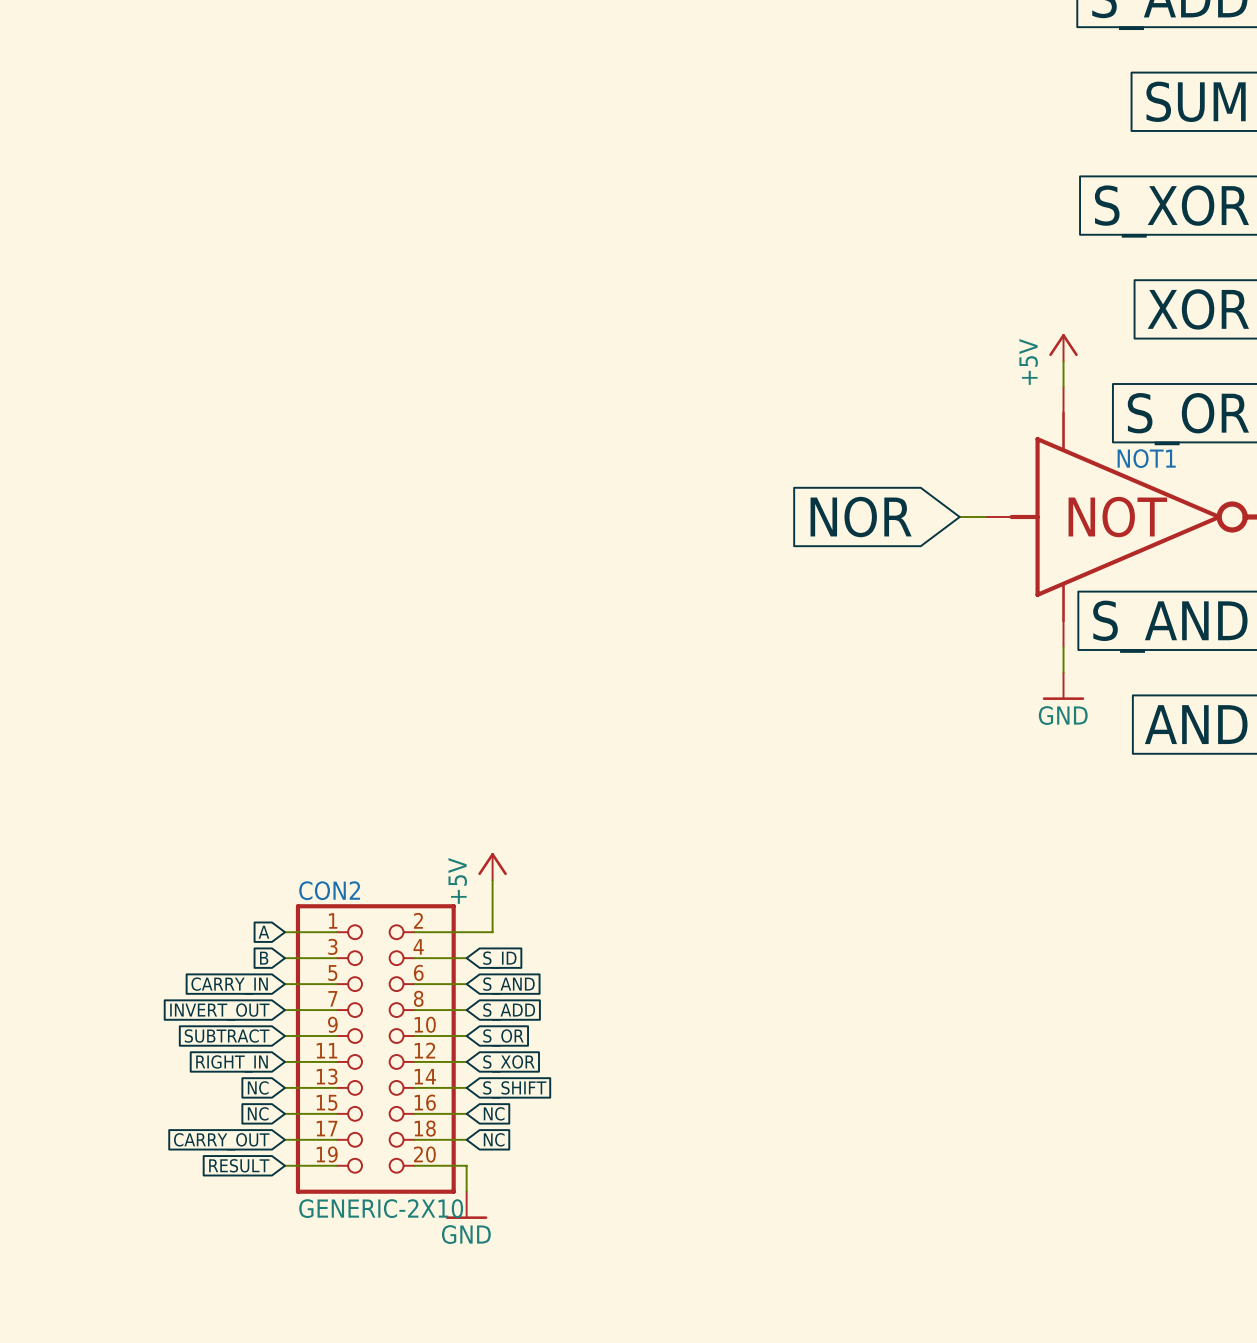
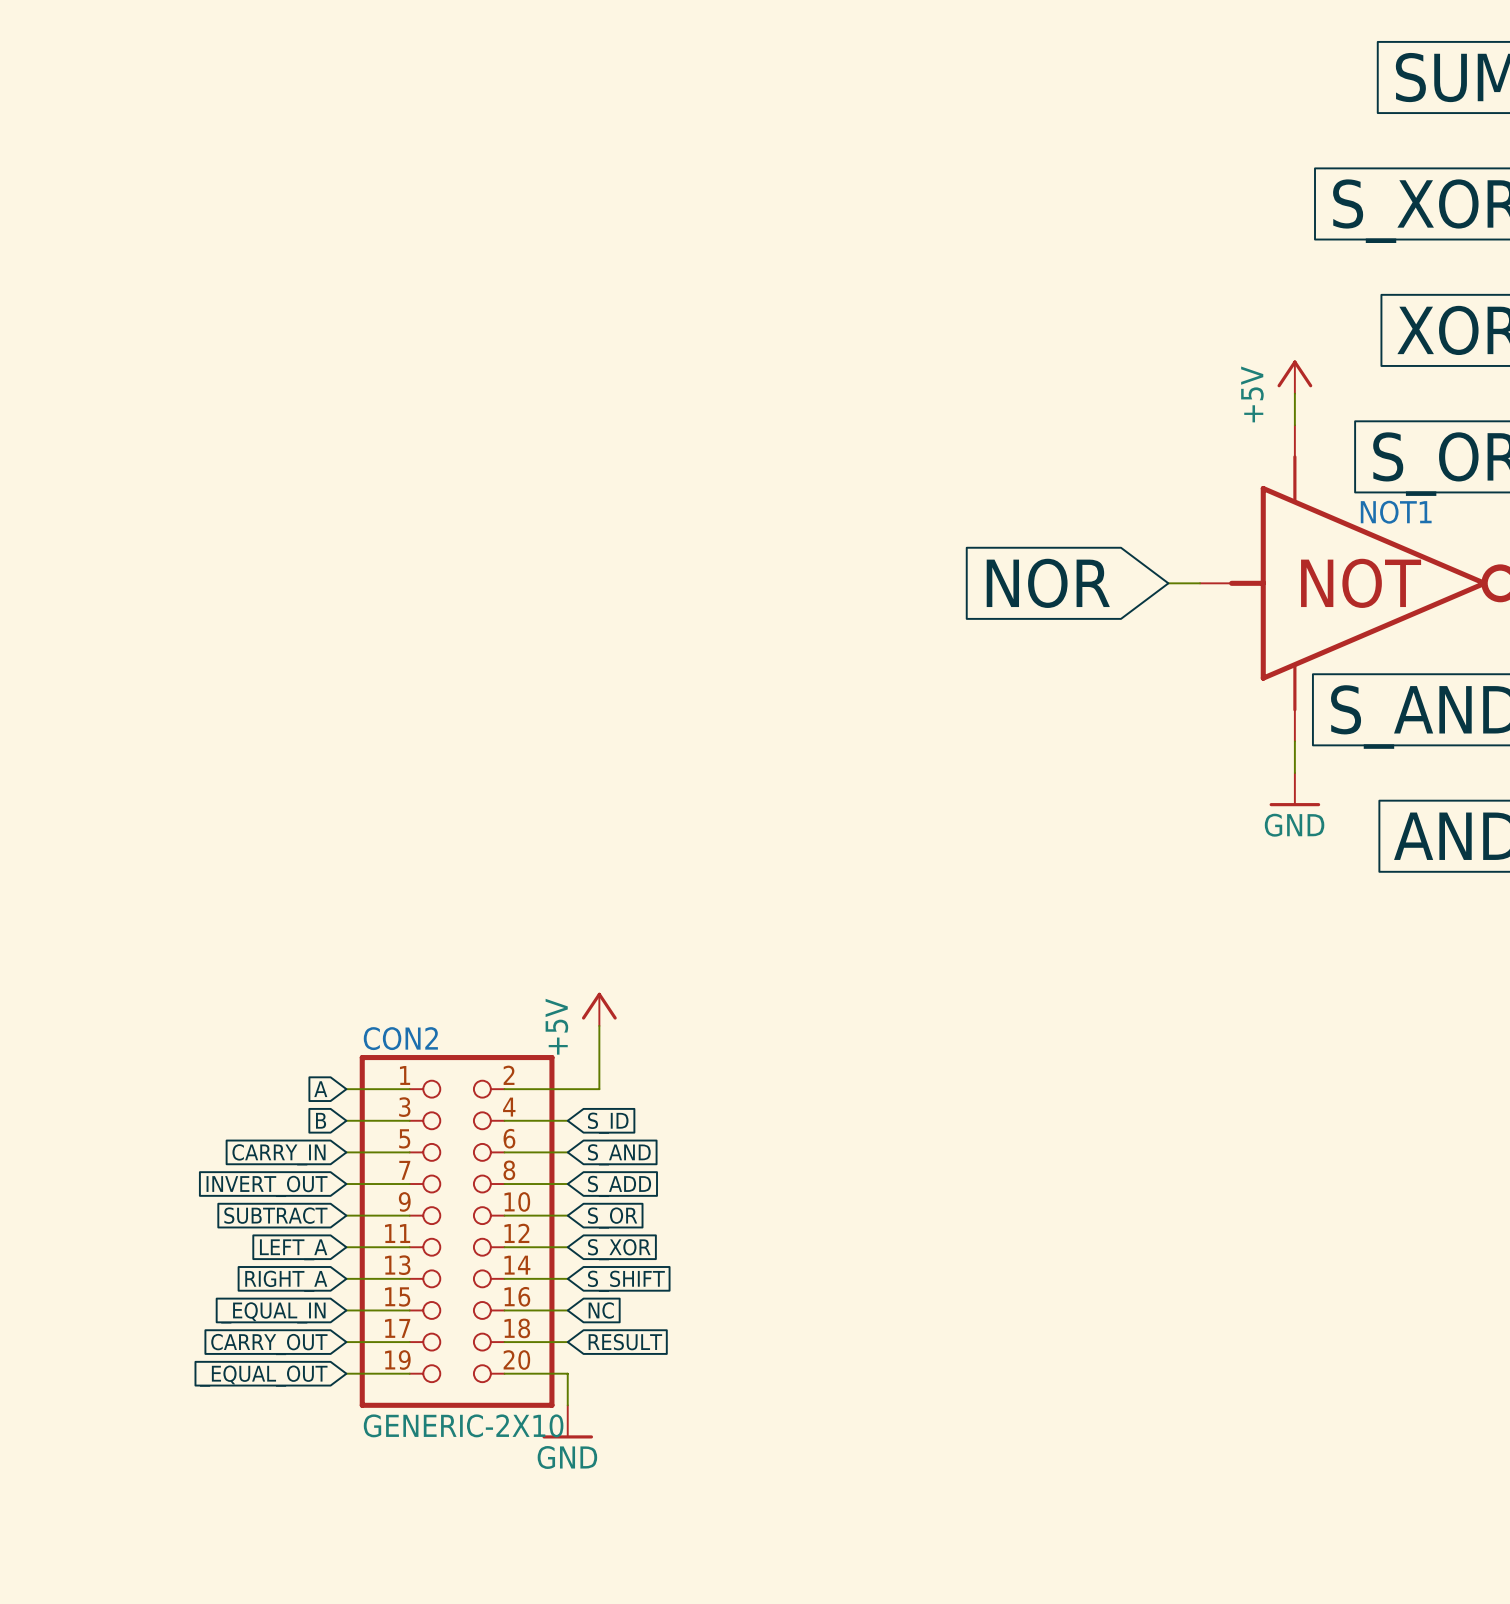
global label: RIGHT_IN (232, 1063) -> LEFT_A (293, 1249)
global label: NC (258, 1087) -> RIGHT_A (286, 1281)
global label: NC (258, 1113) -> _EQUAL_IN (273, 1312)
global label: NC (494, 1139) -> RESULT (625, 1342)
global label: RESULT (239, 1165) -> _EQUAL_OUT (263, 1376)

